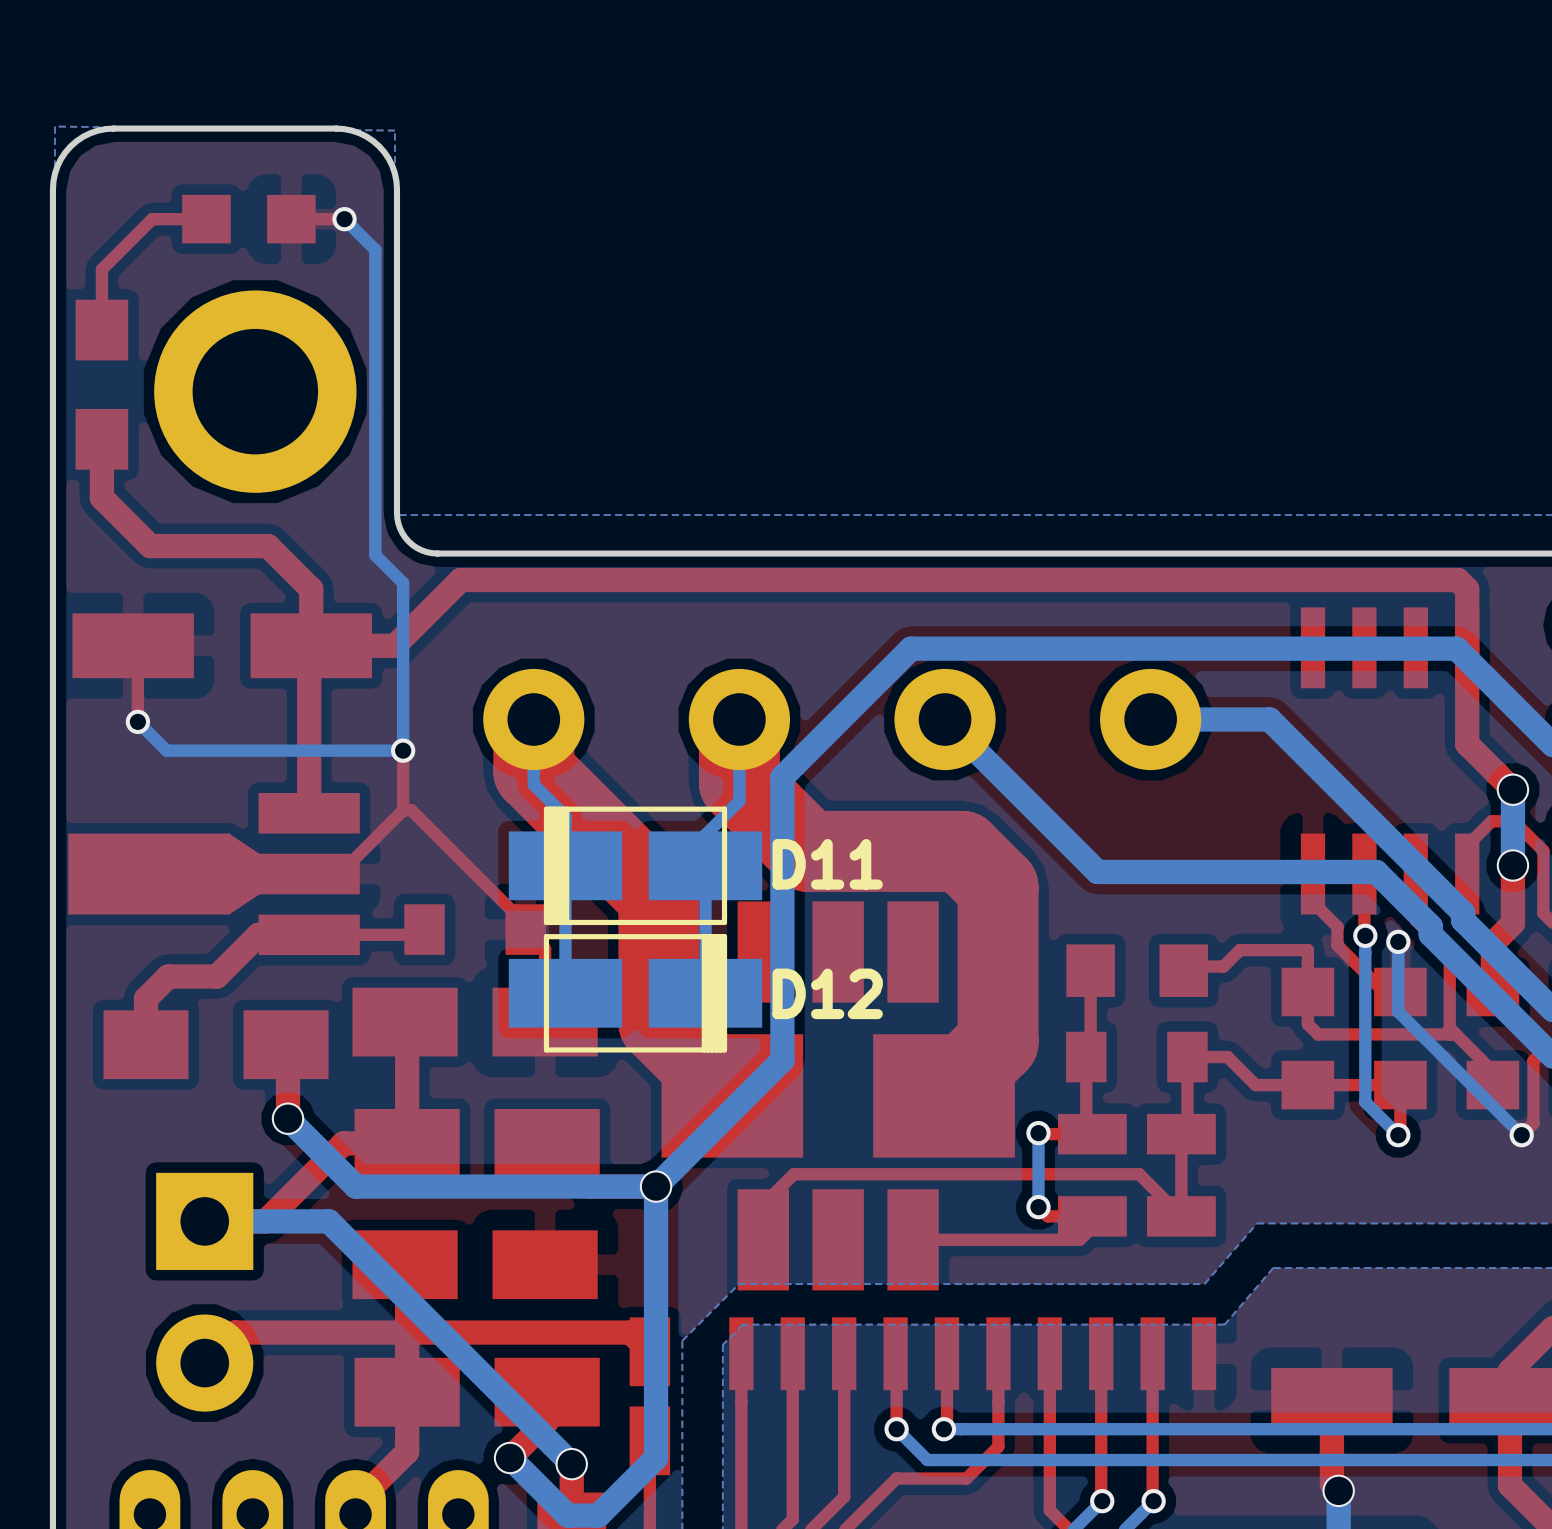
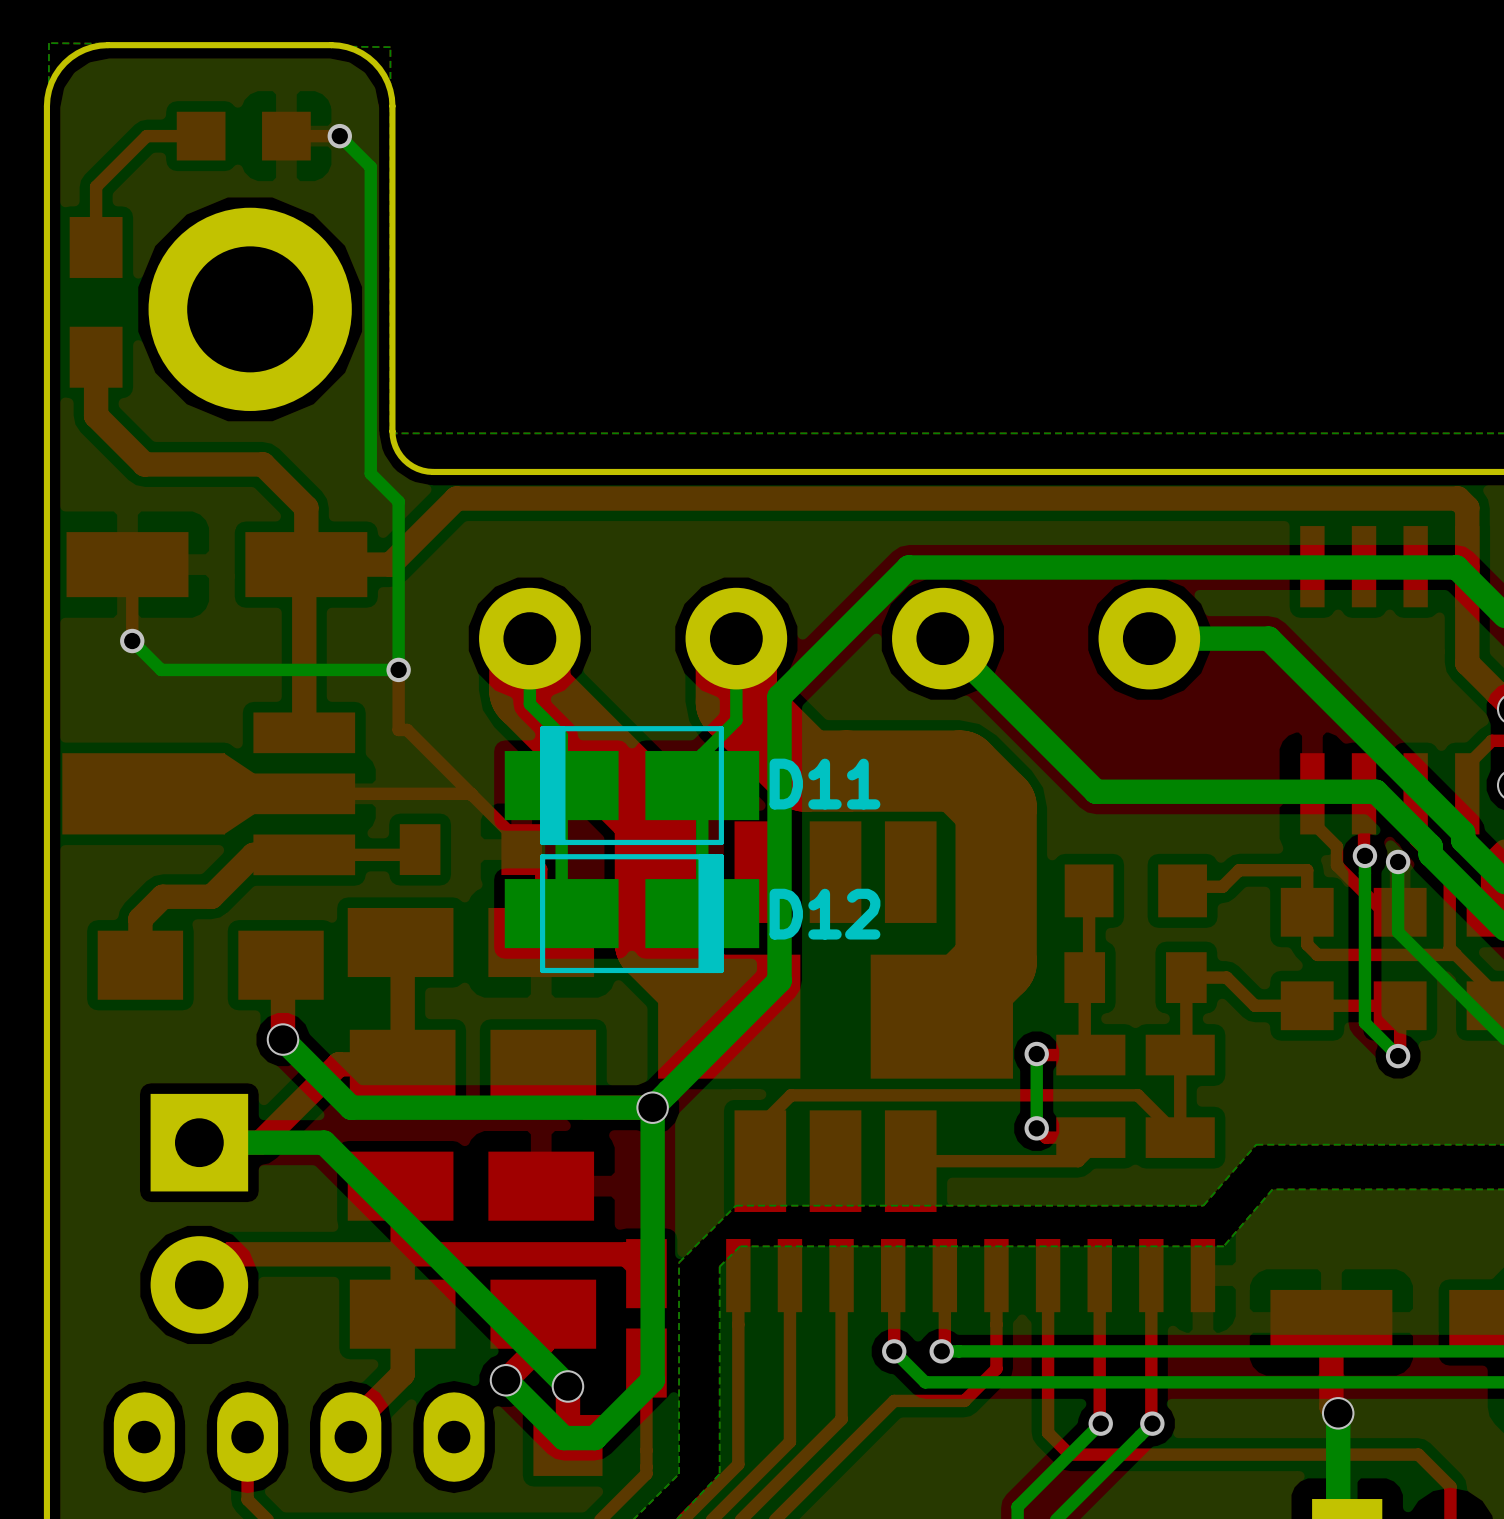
top track: (403, 810) (339, 874) -> none
top track: none -> (471, 793) (304, 793)

